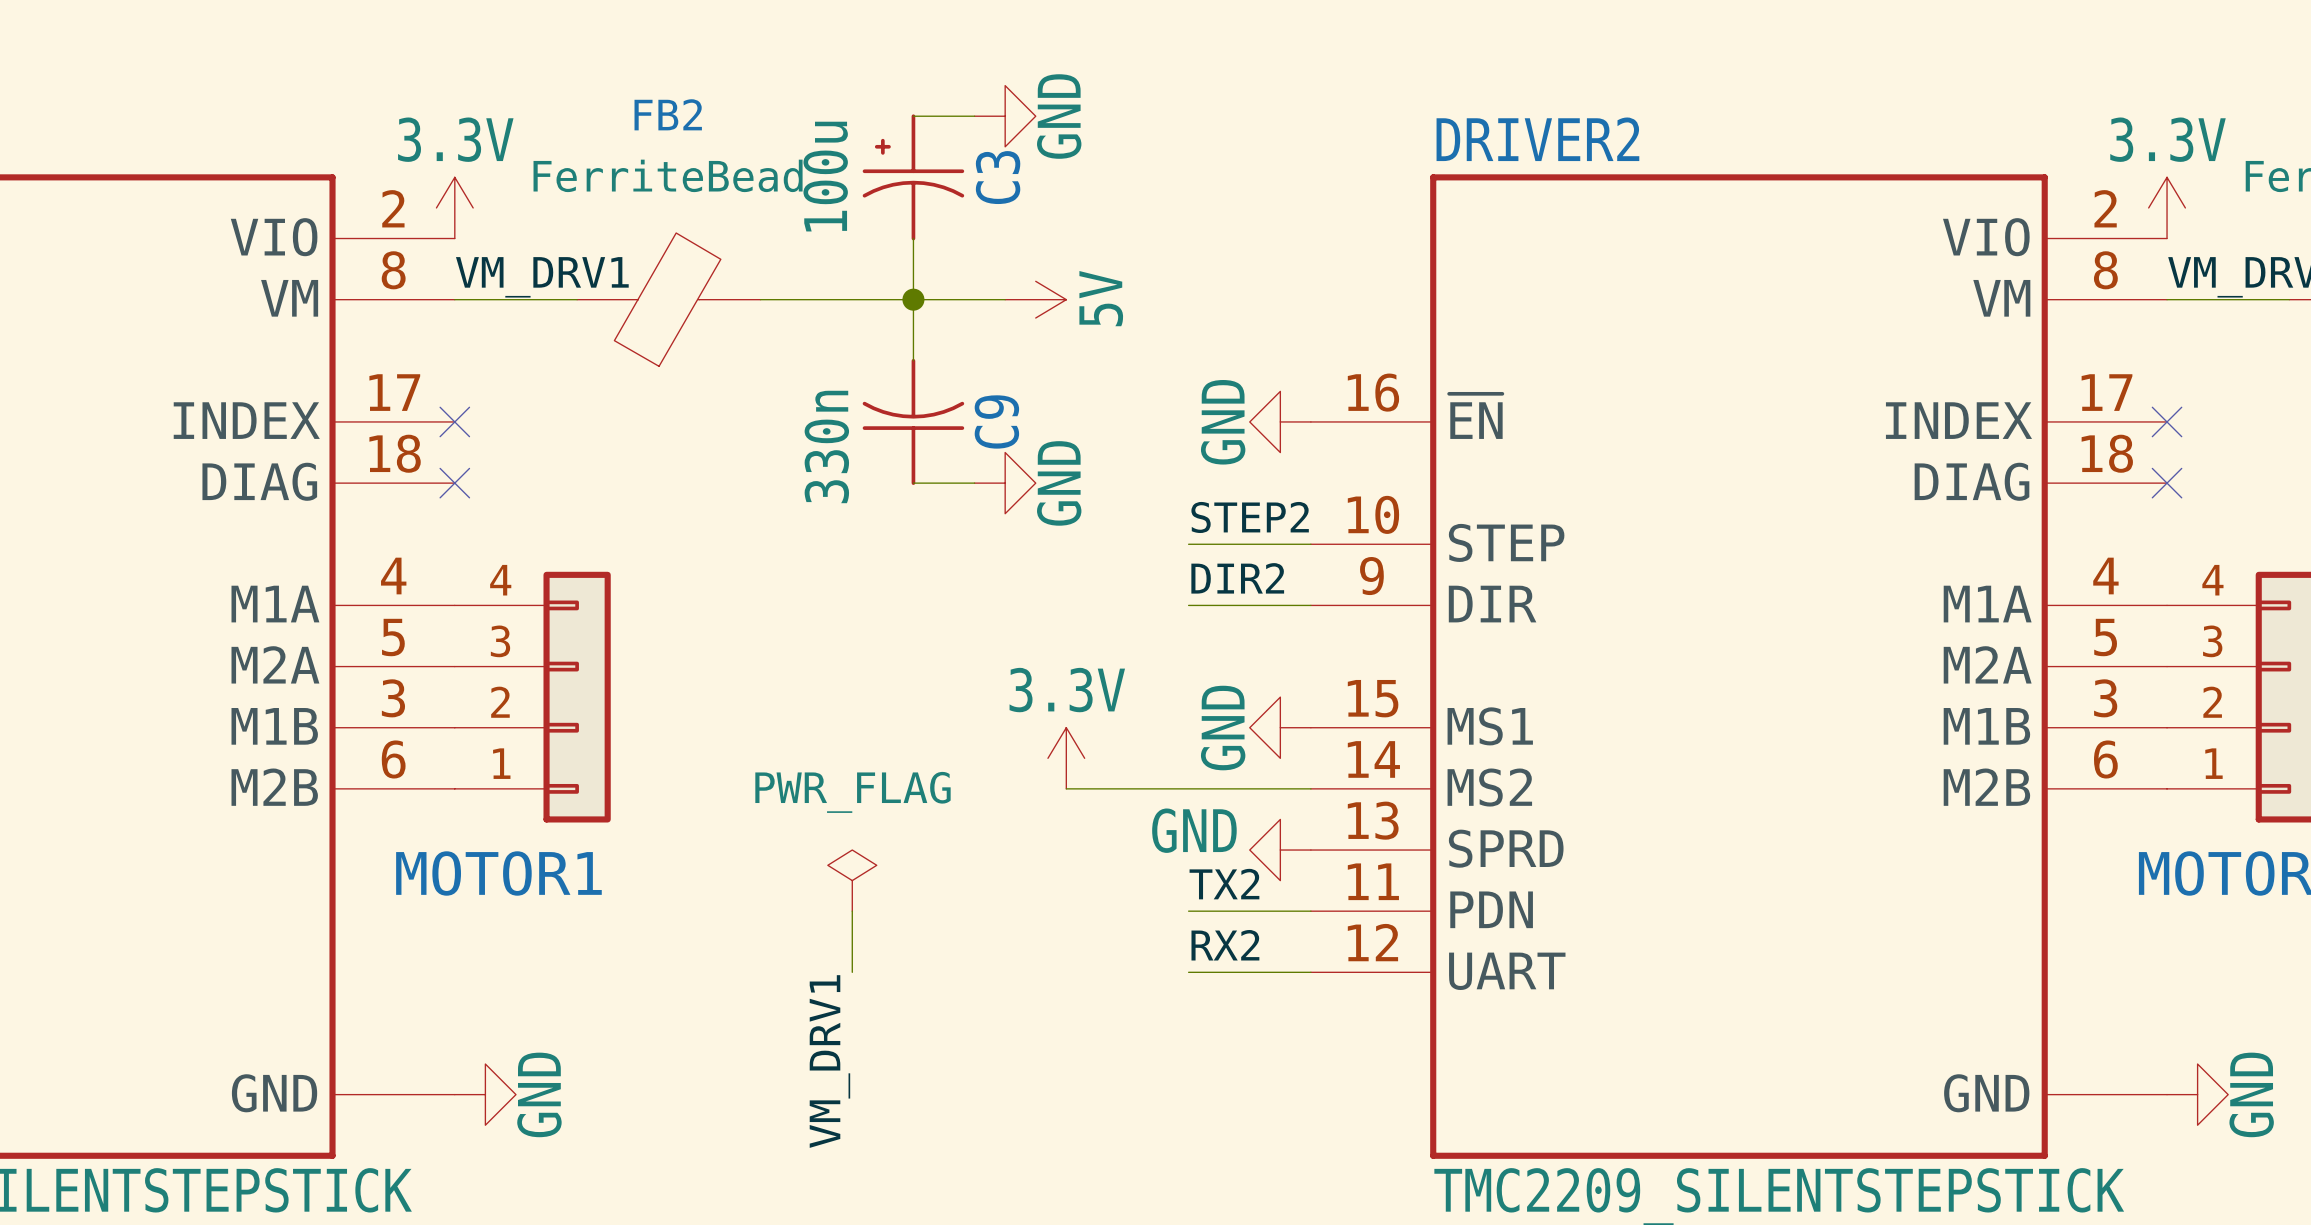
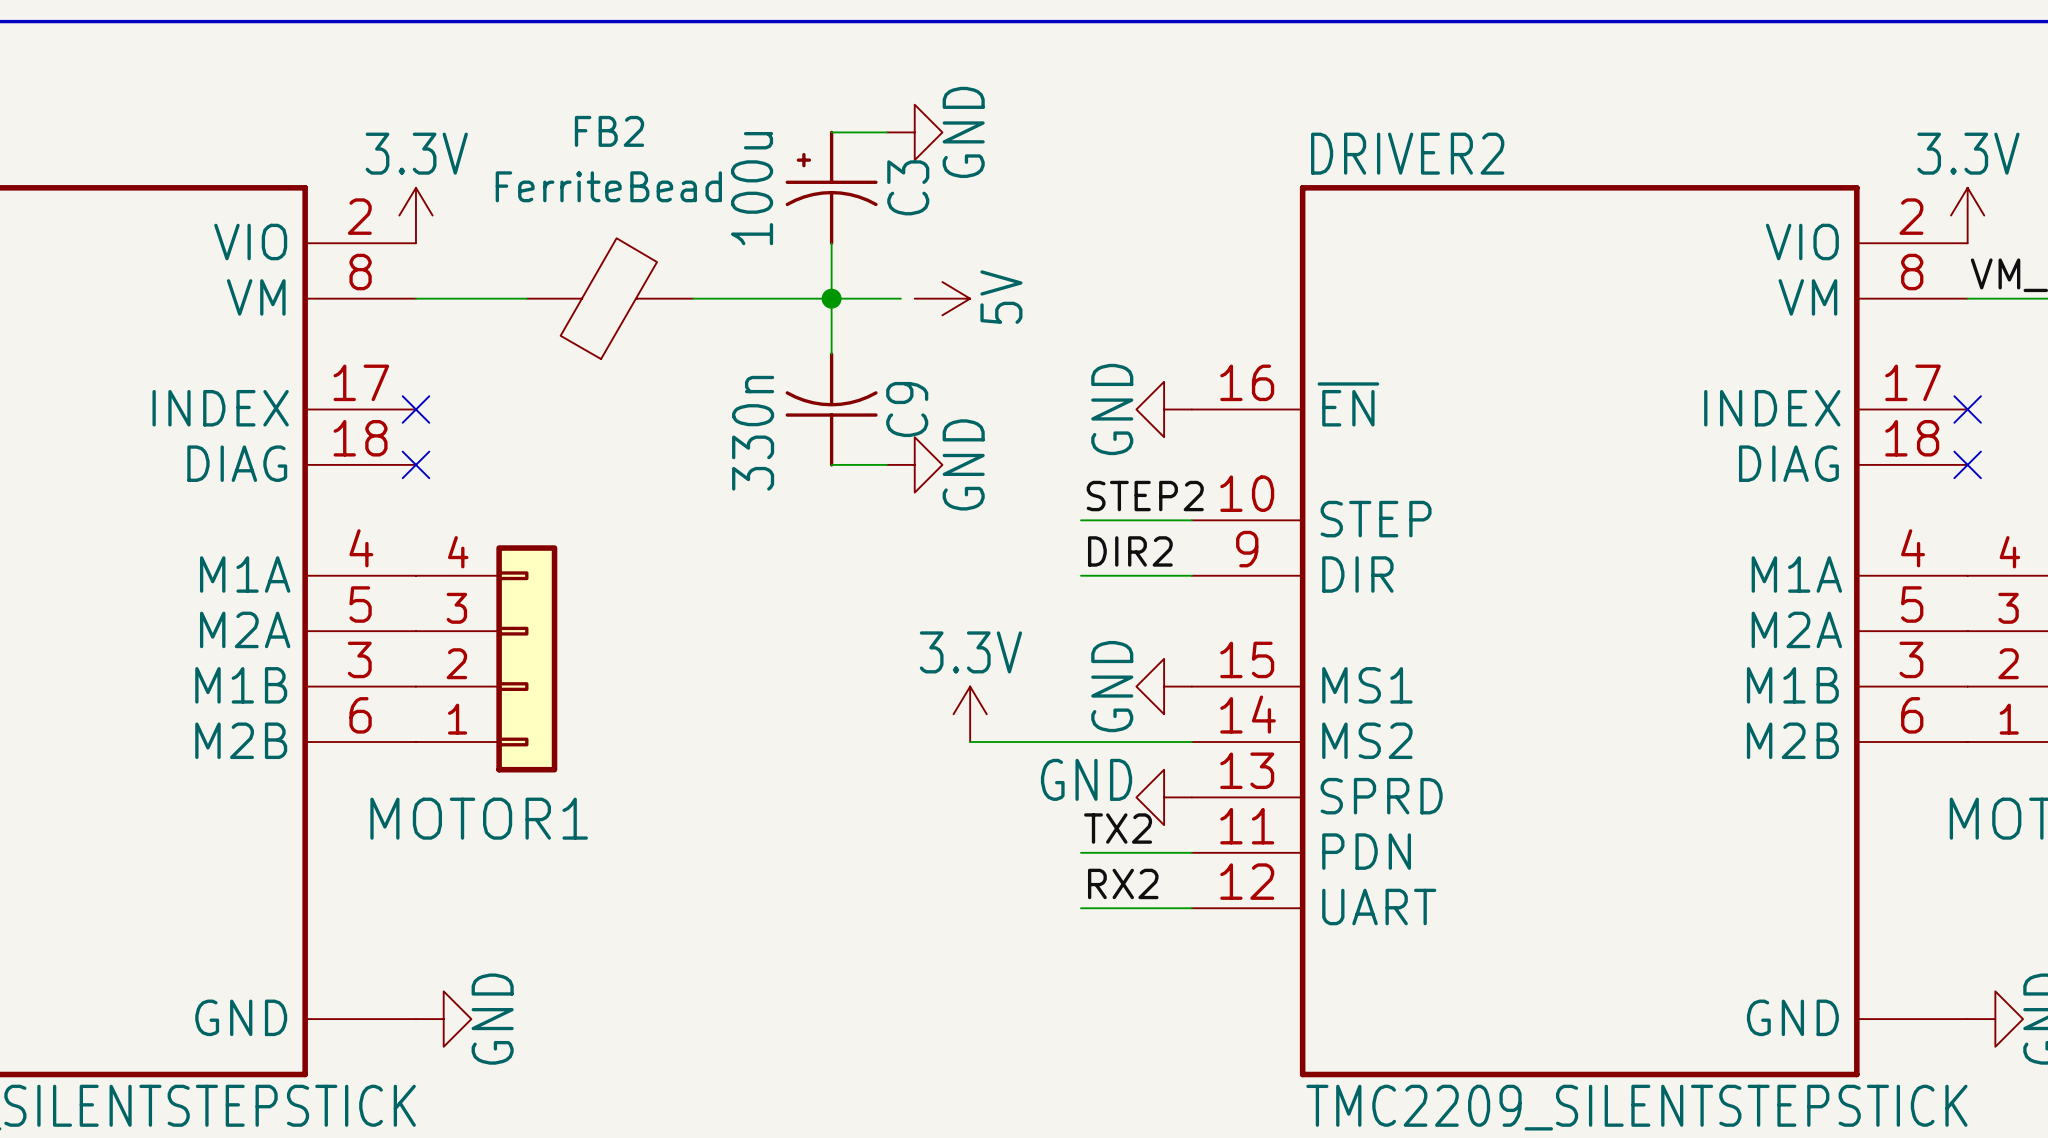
label: VM_DRV1 (542, 277) -> none
wire: (989, 299) (1005, 299) -> none
power symbol: PWR_FLAG (852, 880) -> none
wire: (852, 911) (852, 972) -> none
label: VM_DRV1 (829, 1061) -> none

